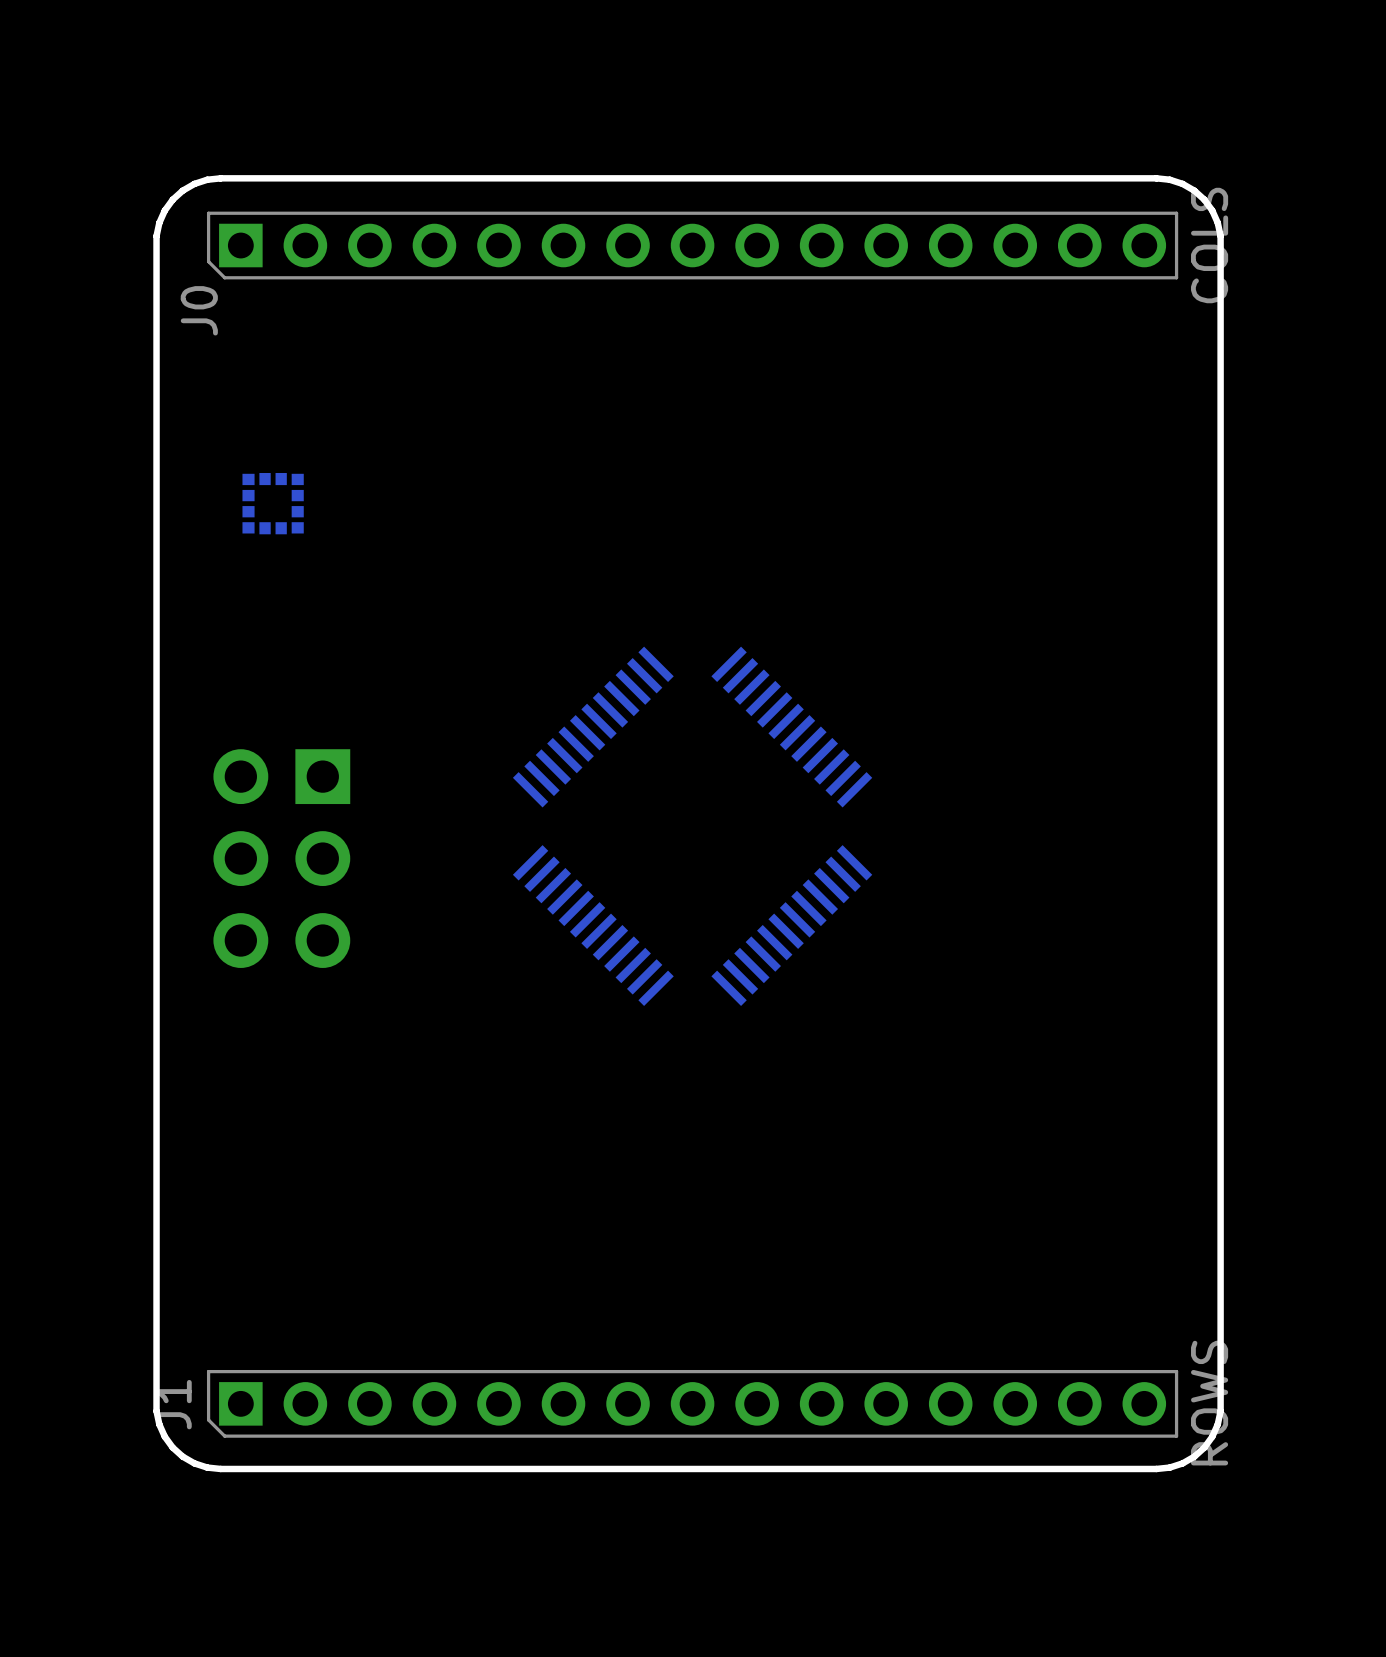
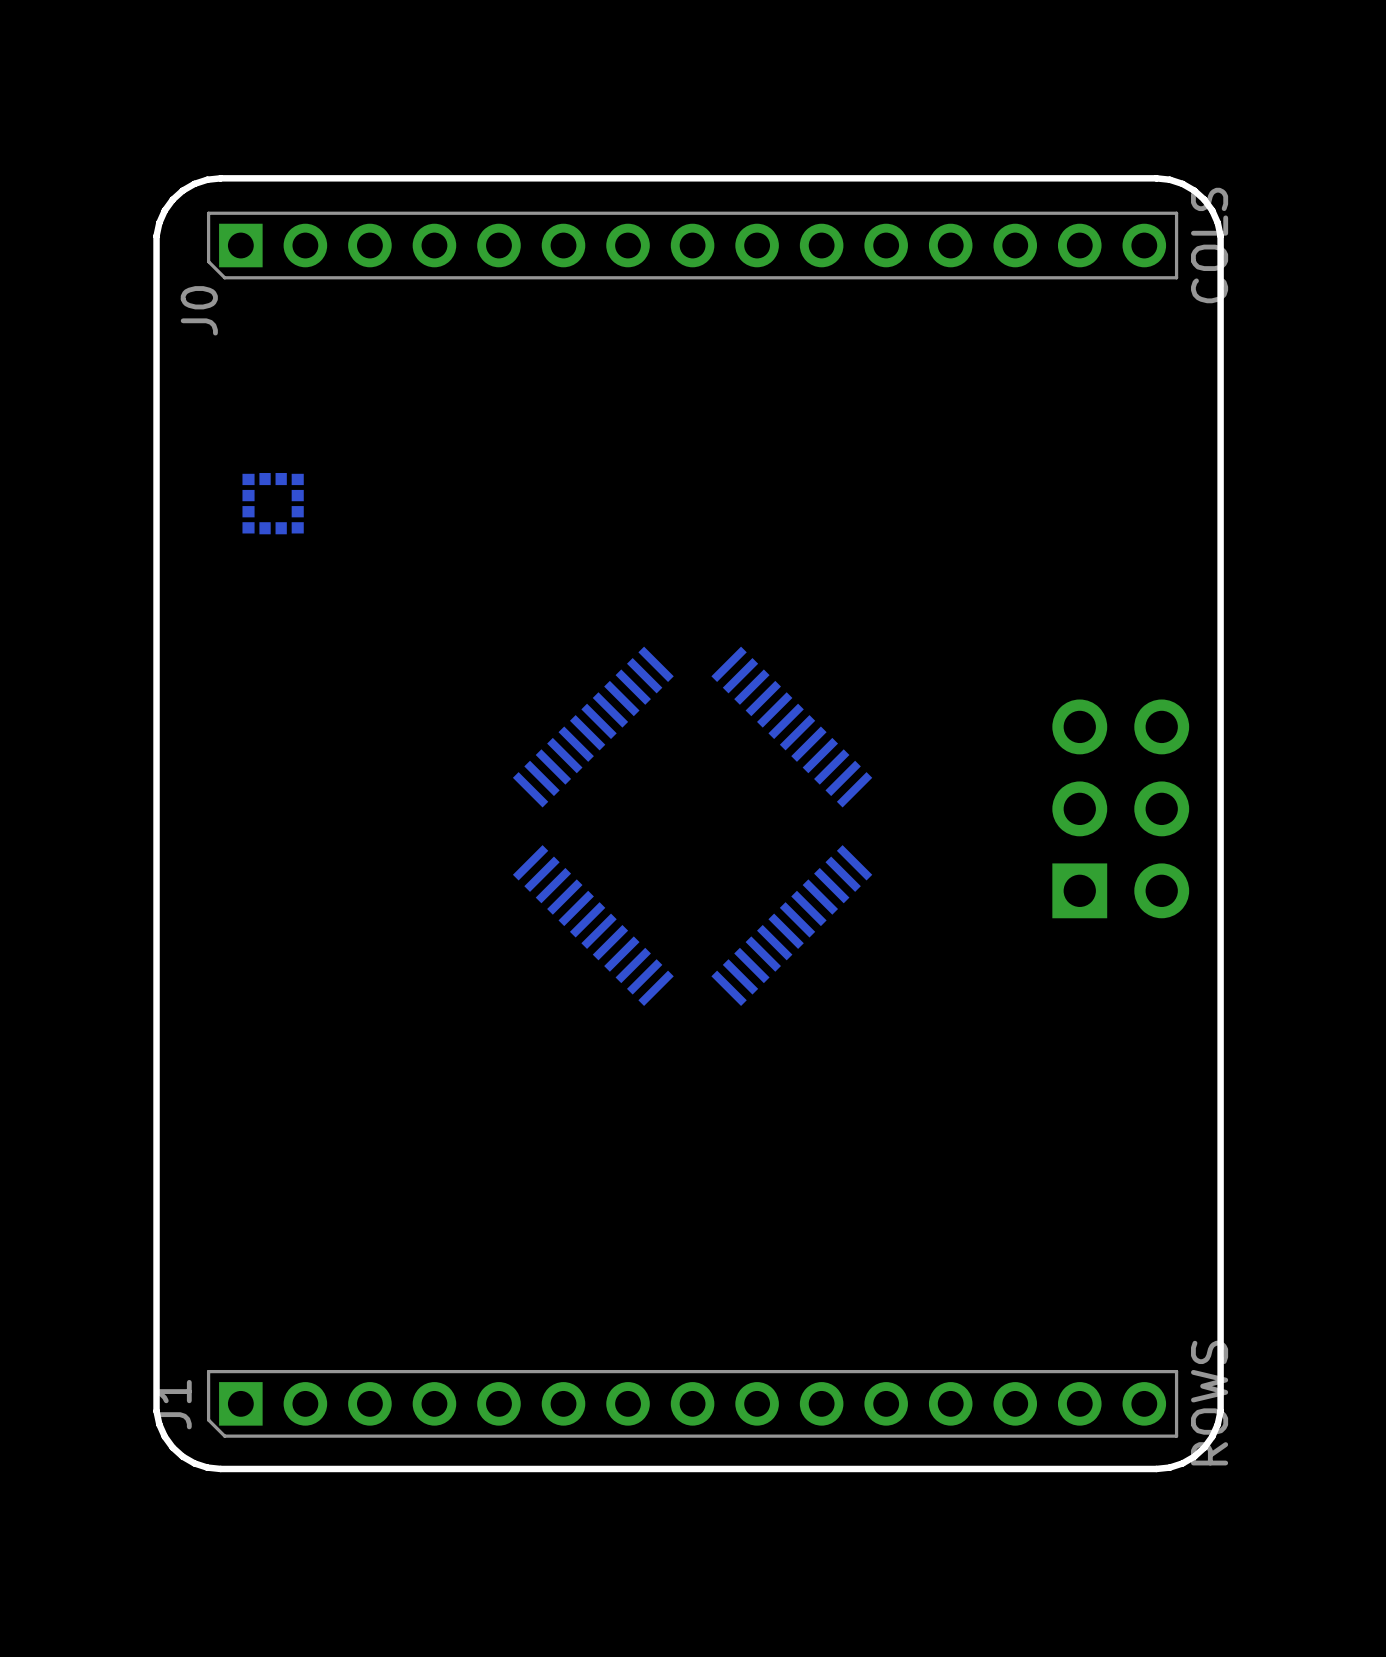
part: none -> (1120, 808)
part: (281, 858) -> none

